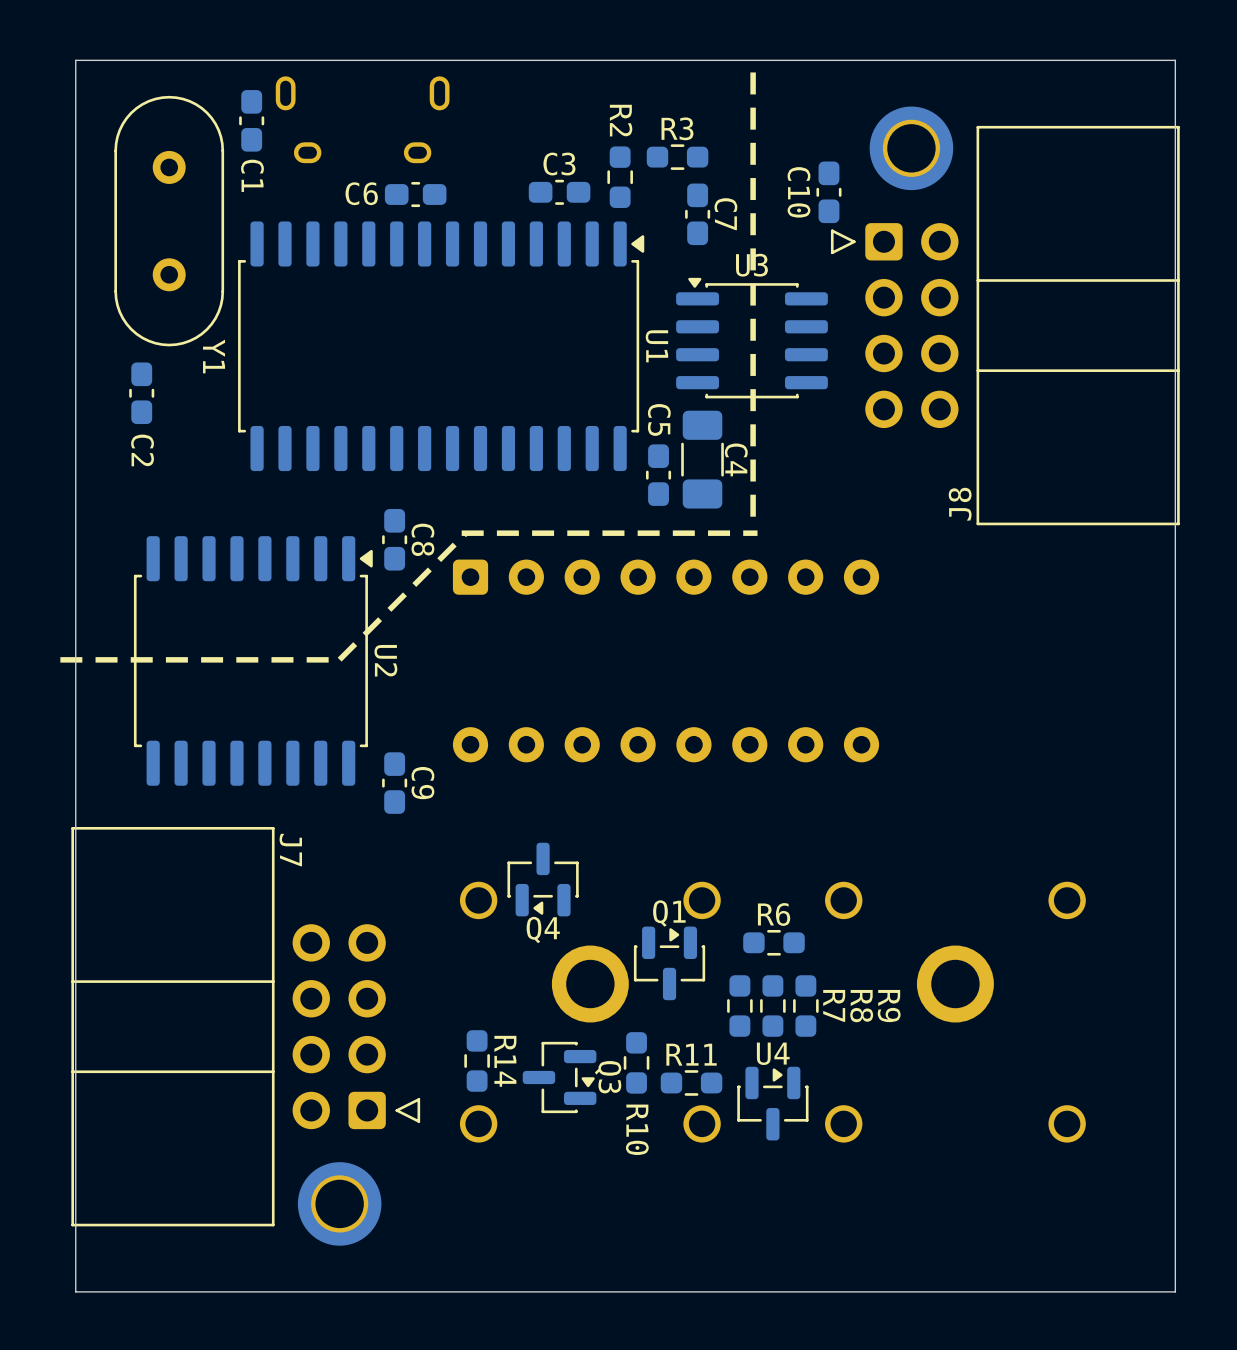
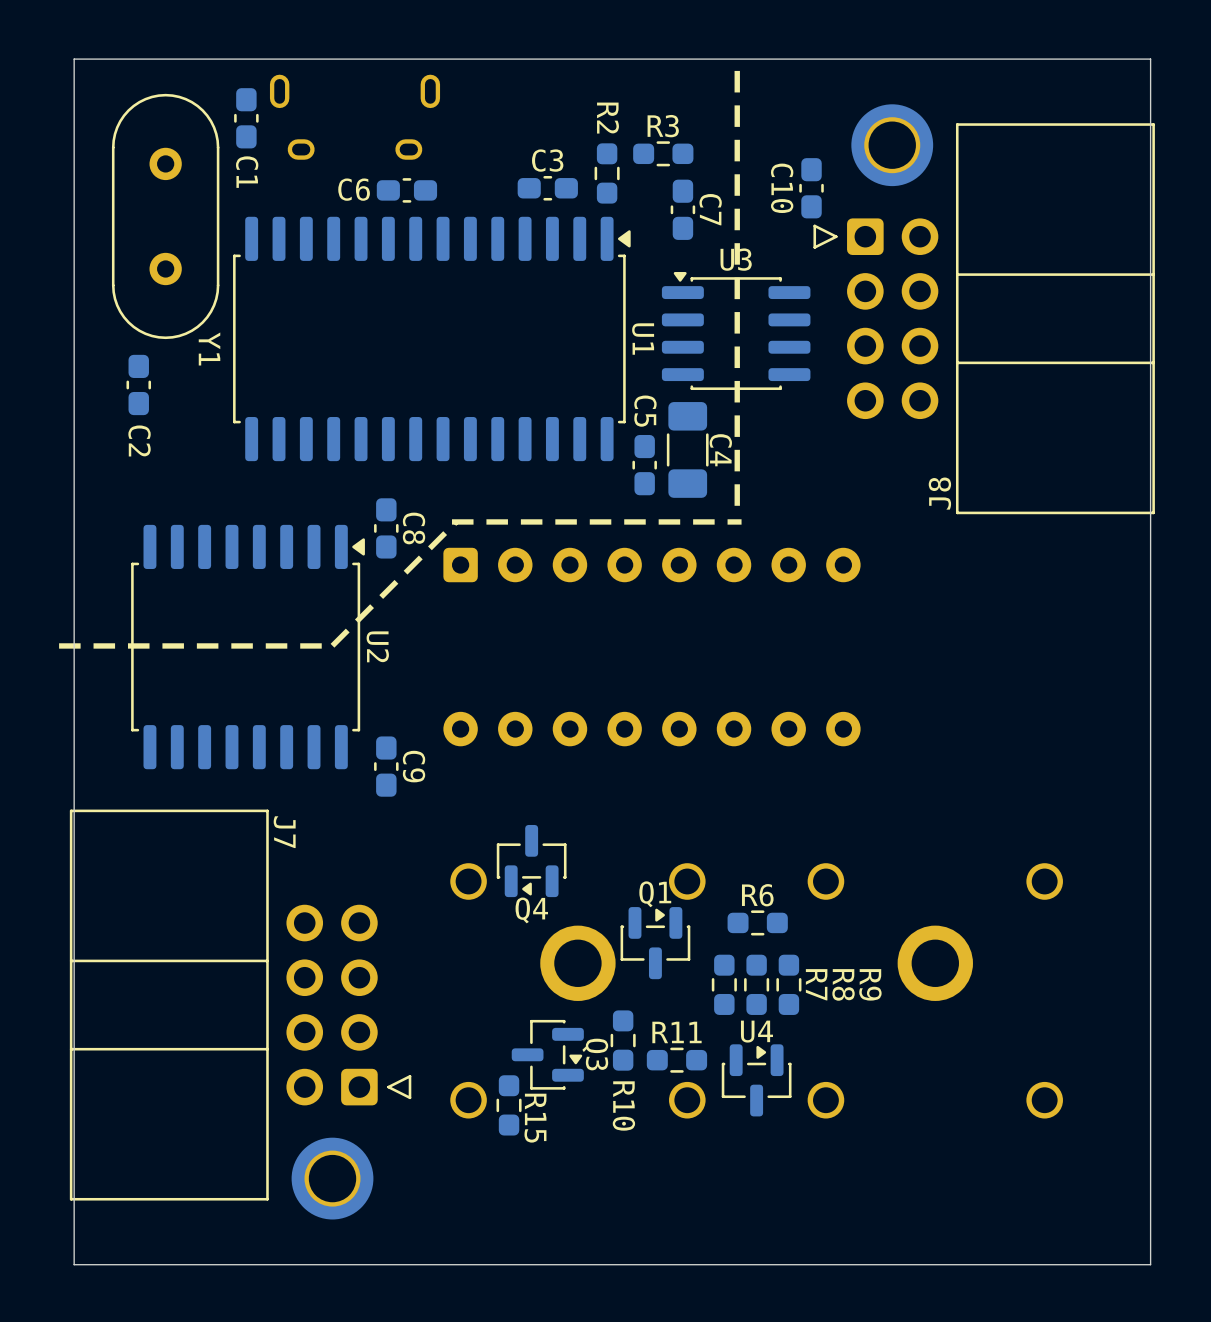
R14: (477, 1060) -> none
R15: none -> (509, 1105)

